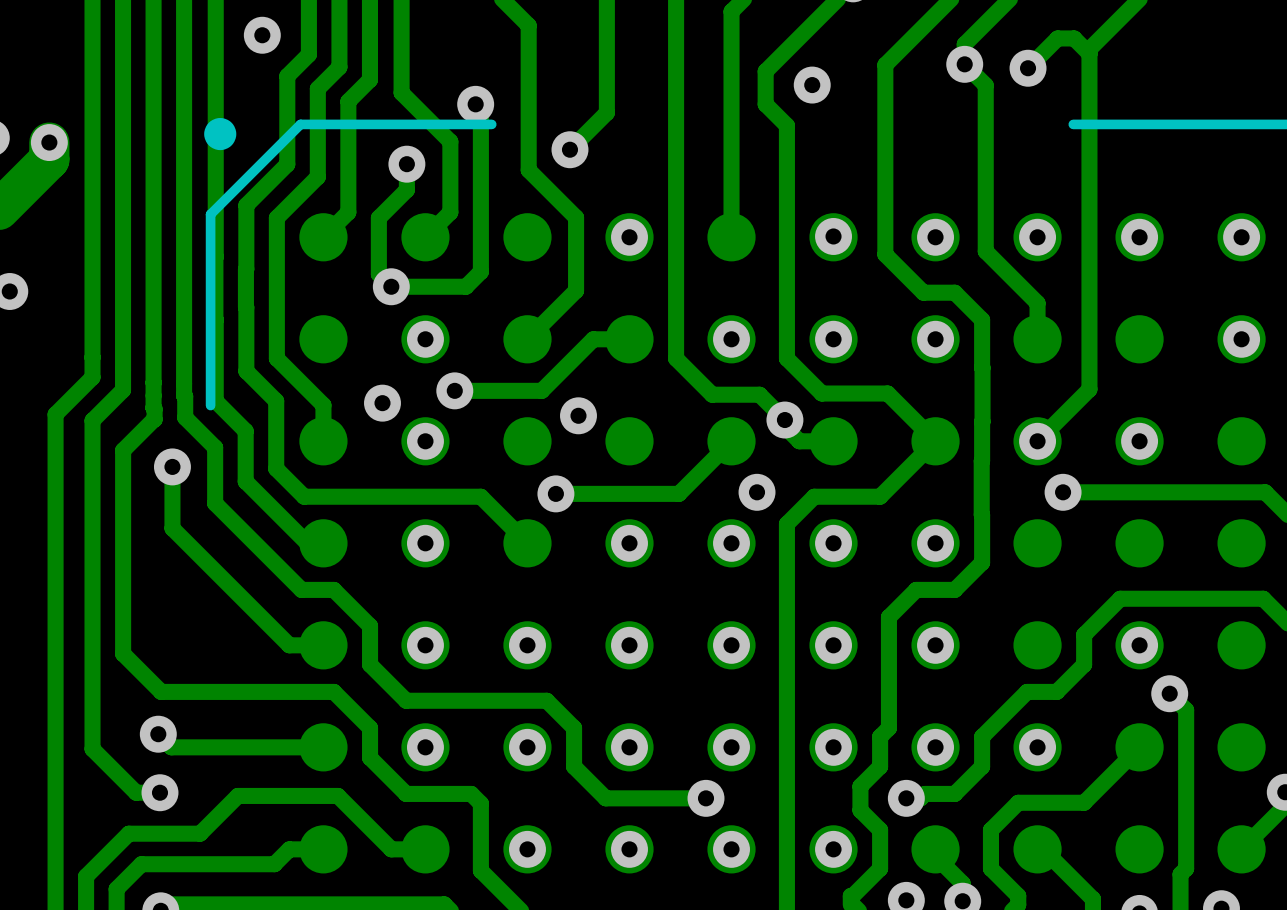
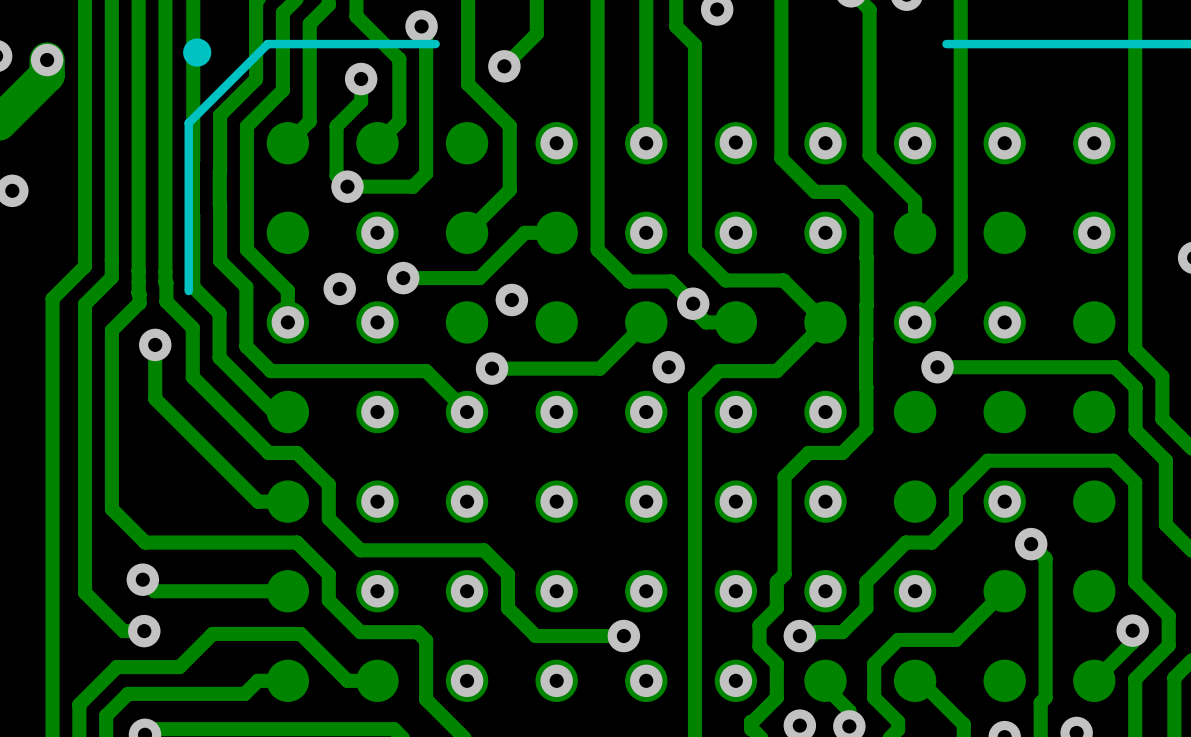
via: none -> (646, 143)
via: none -> (287, 322)
via: none -> (467, 412)

